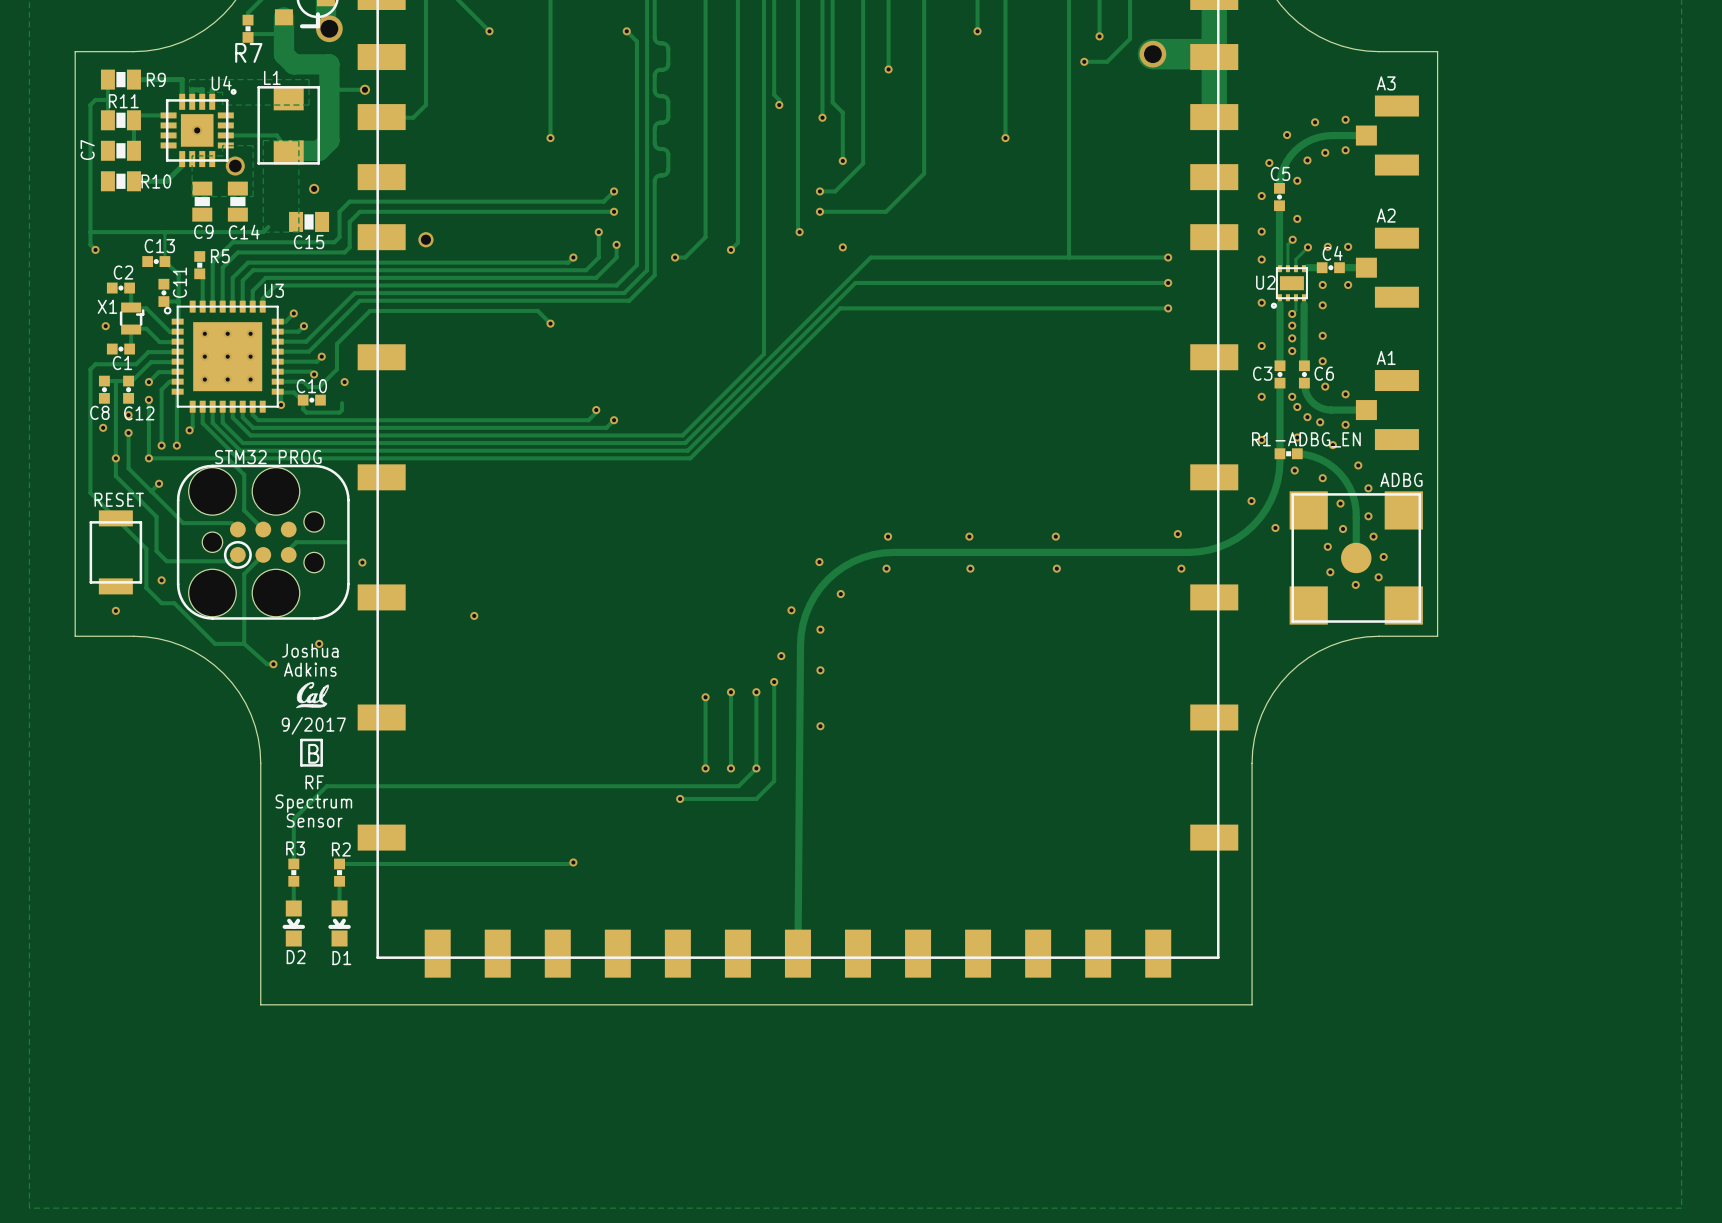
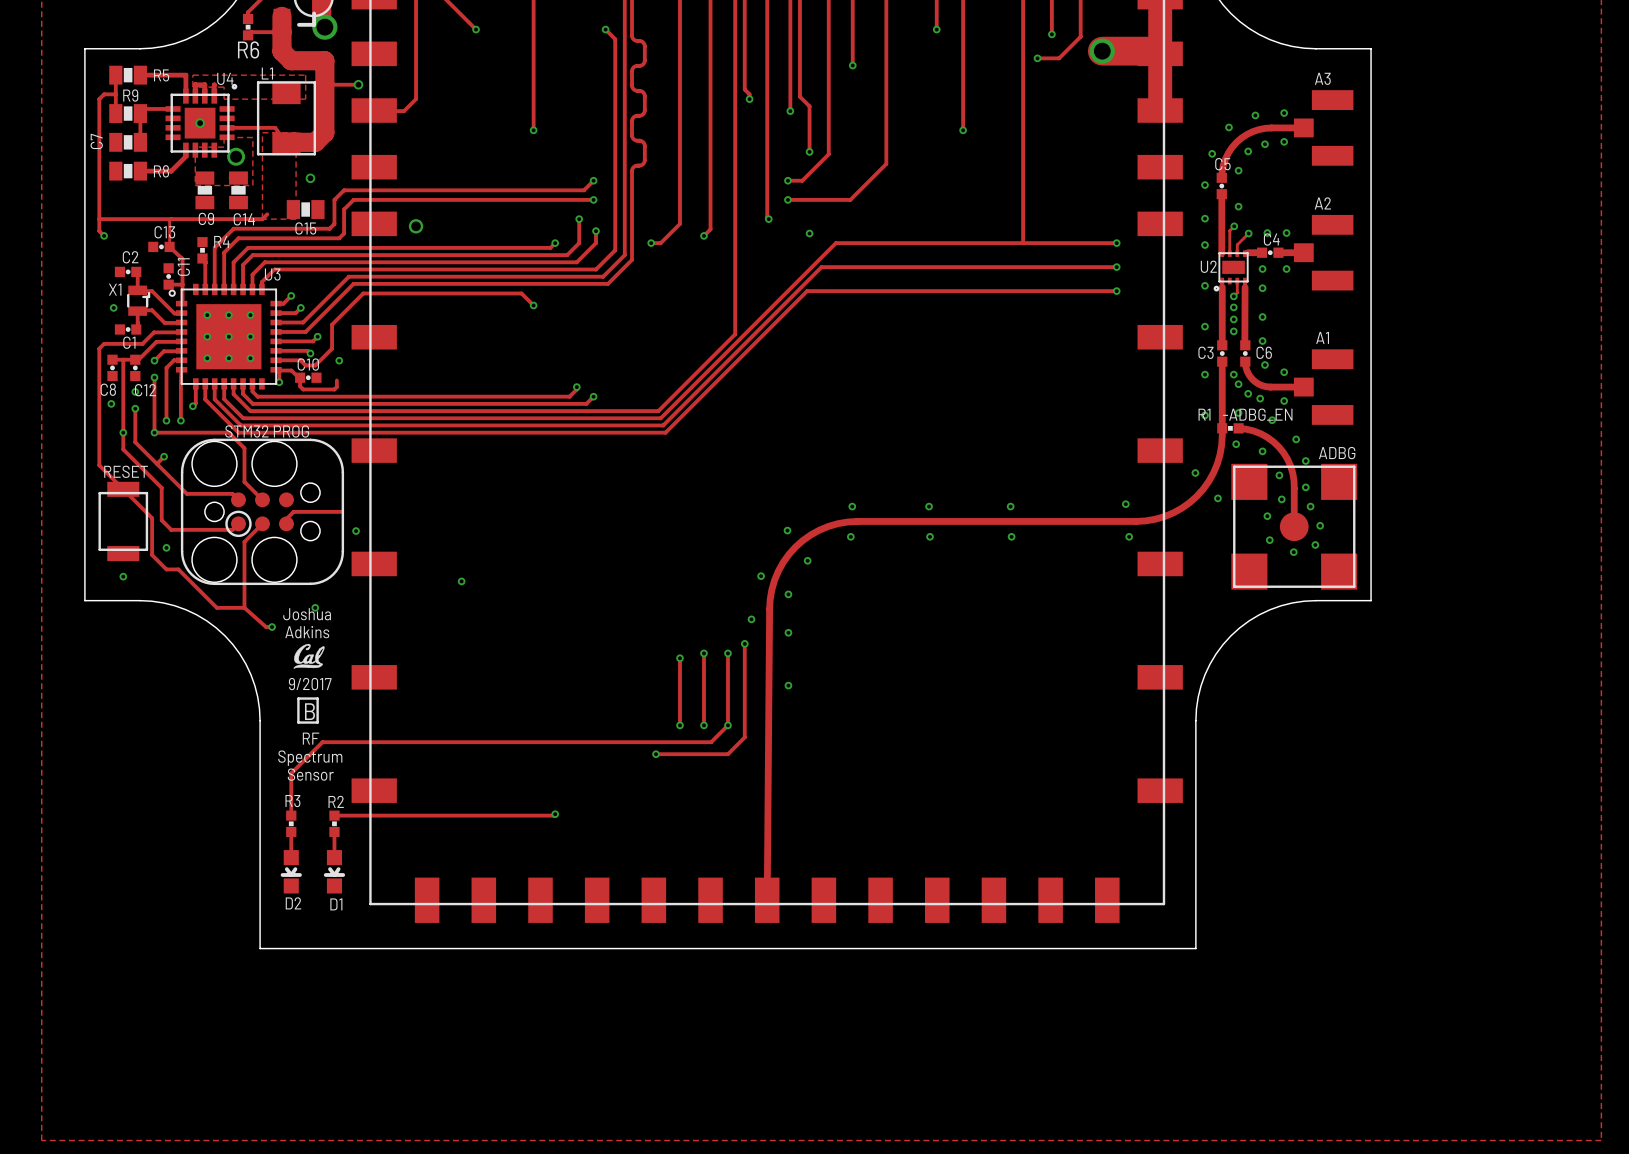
R7 name: R7 (248, 52) -> R6 (248, 49)
R9 name: R9 (156, 79) -> R5 (161, 75)
R11 name: R11 (123, 101) -> R9 (130, 95)
R10 name: R10 (156, 181) -> R8 (161, 171)
R5 name: R5 (220, 256) -> R4 (221, 241)

